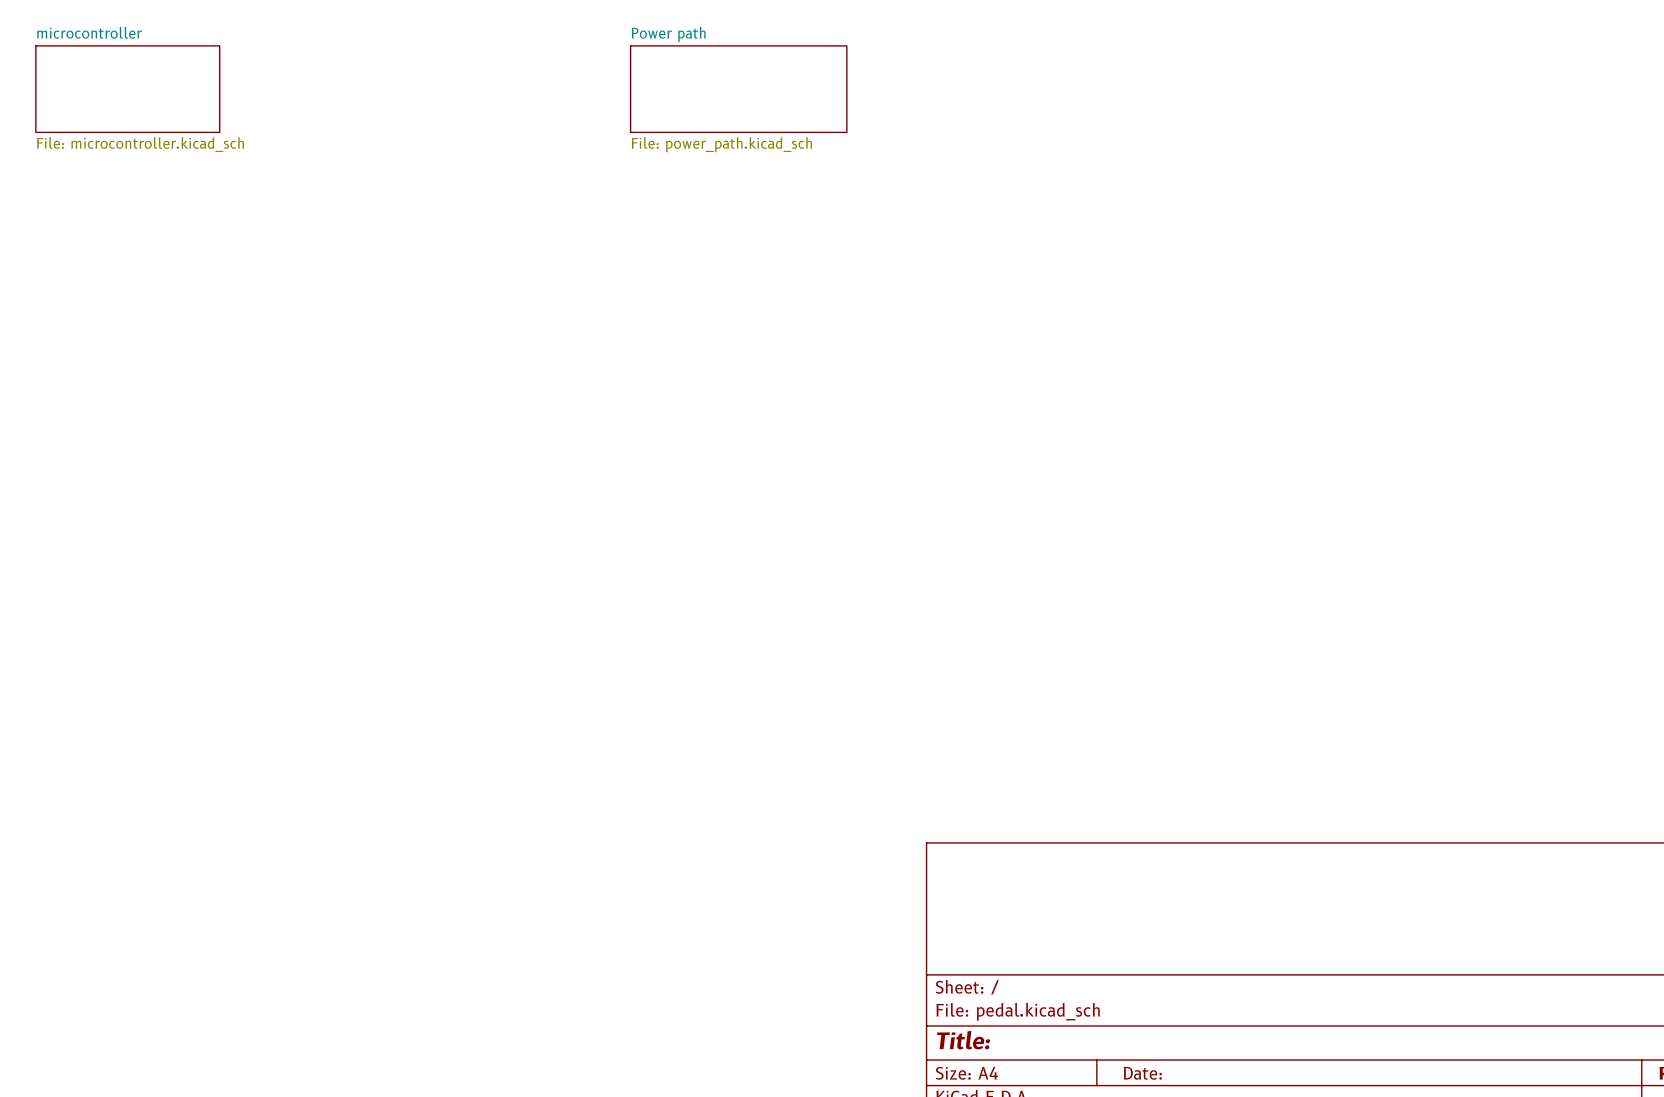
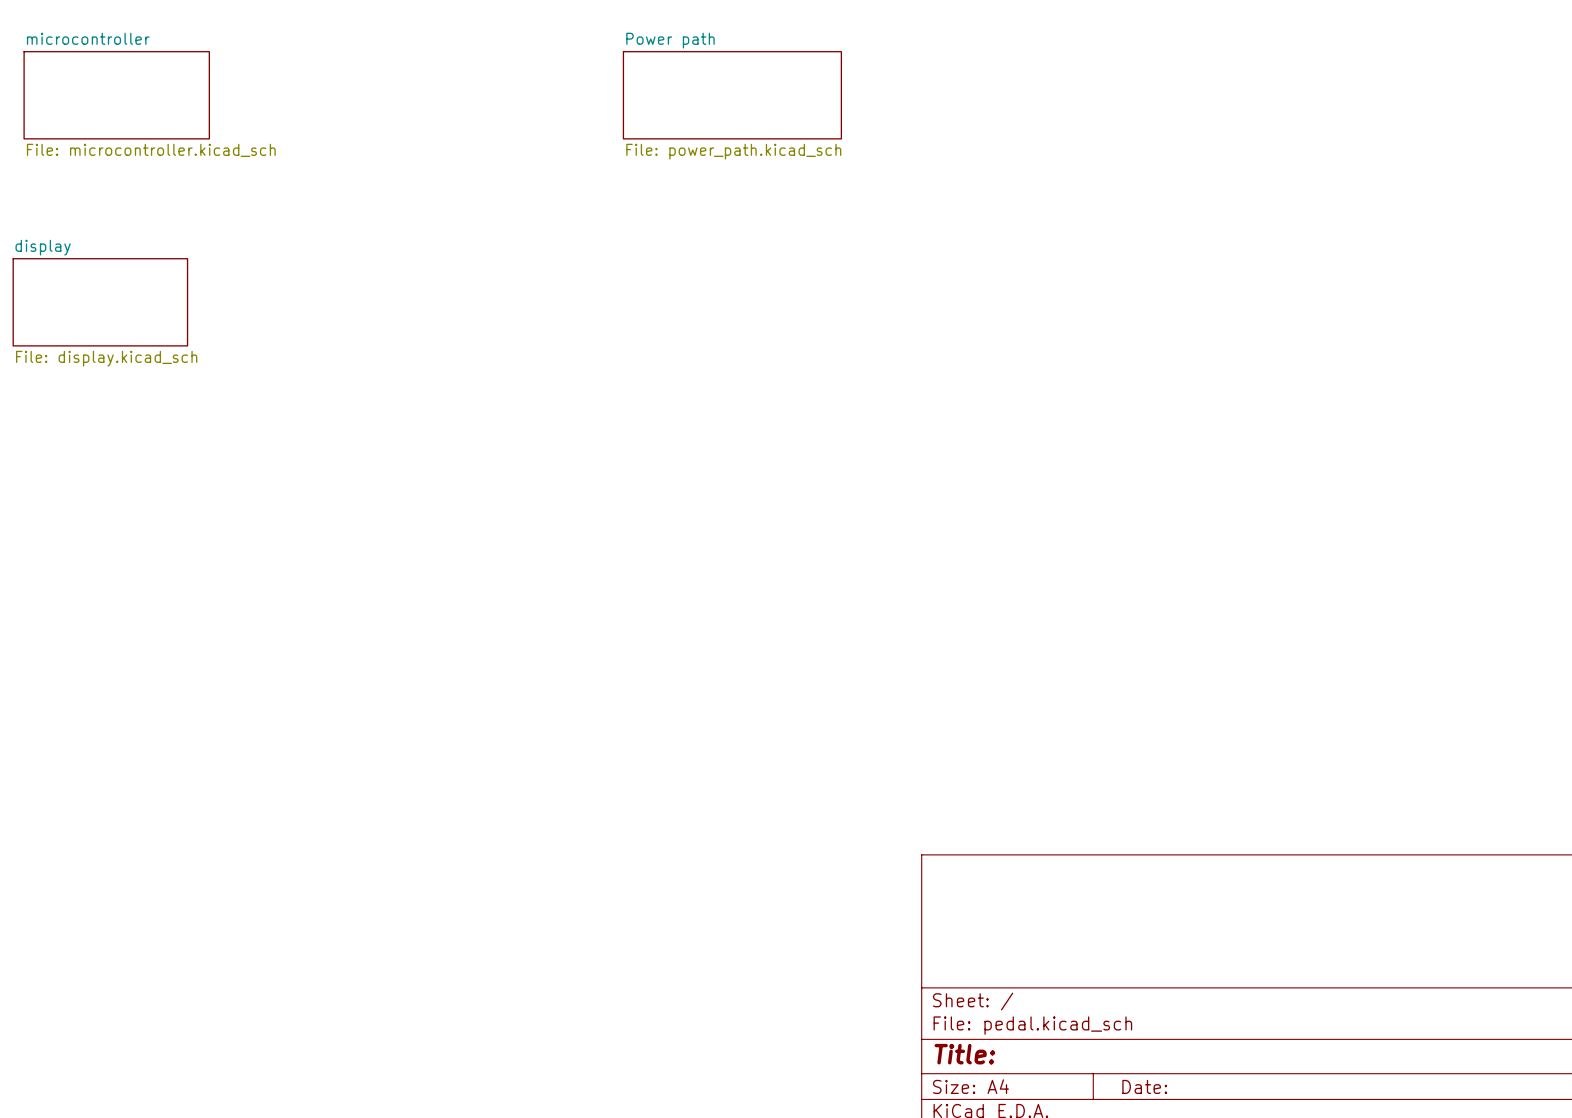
sheet display: none -> File: display.kicad_sch (100, 302)

